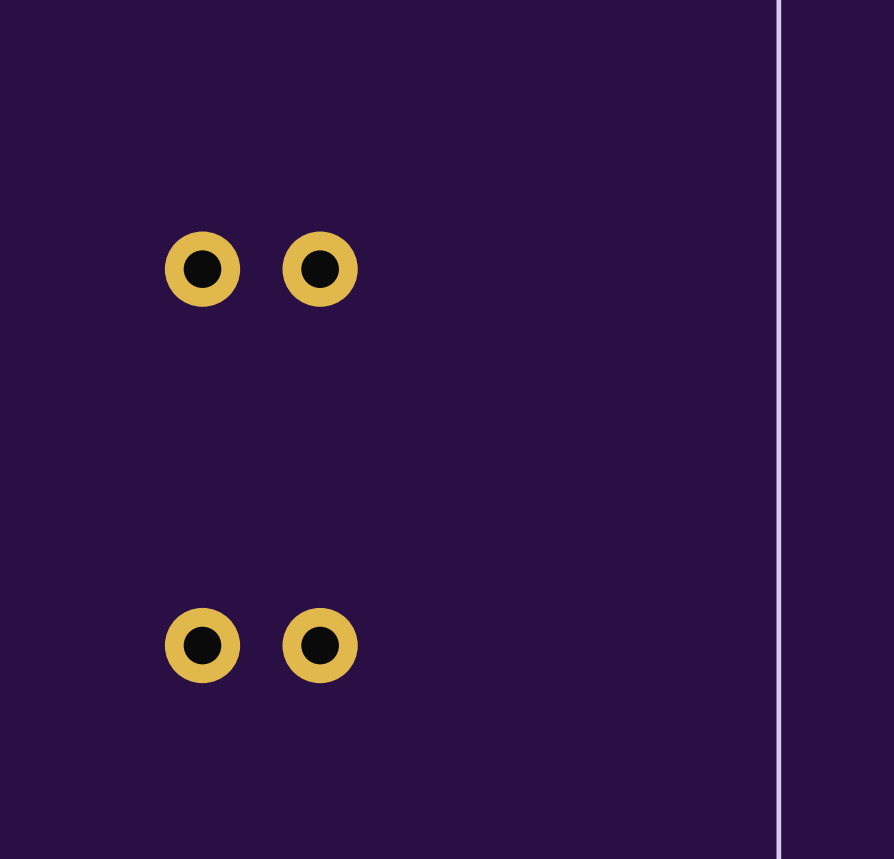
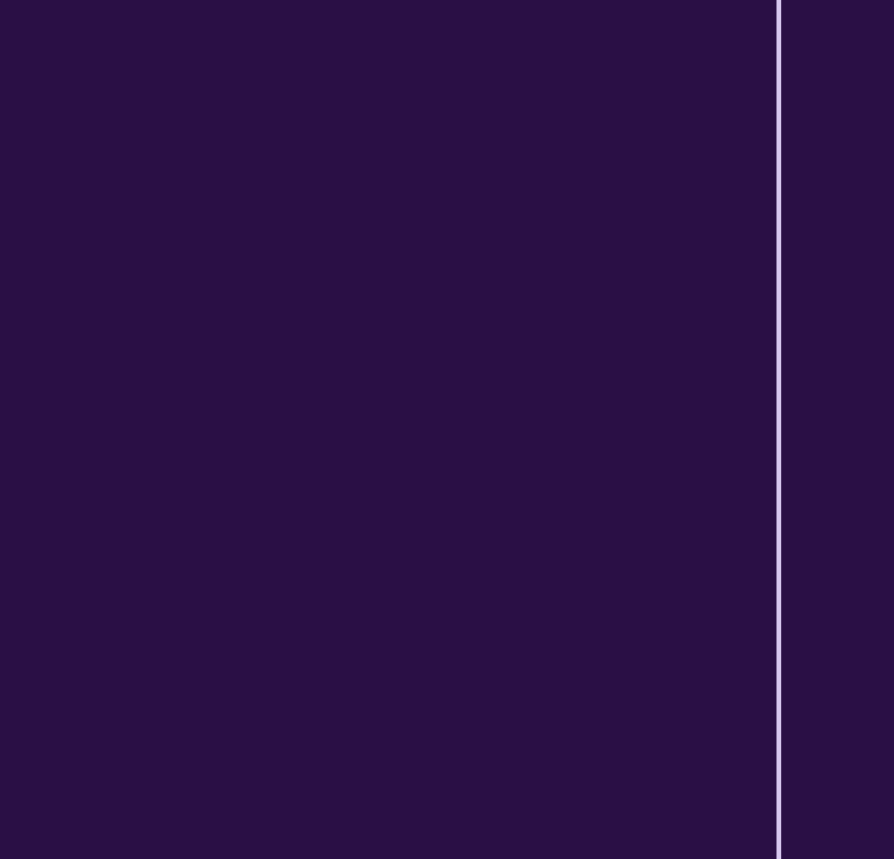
part: (261, 269) -> none
part: (261, 645) -> none

